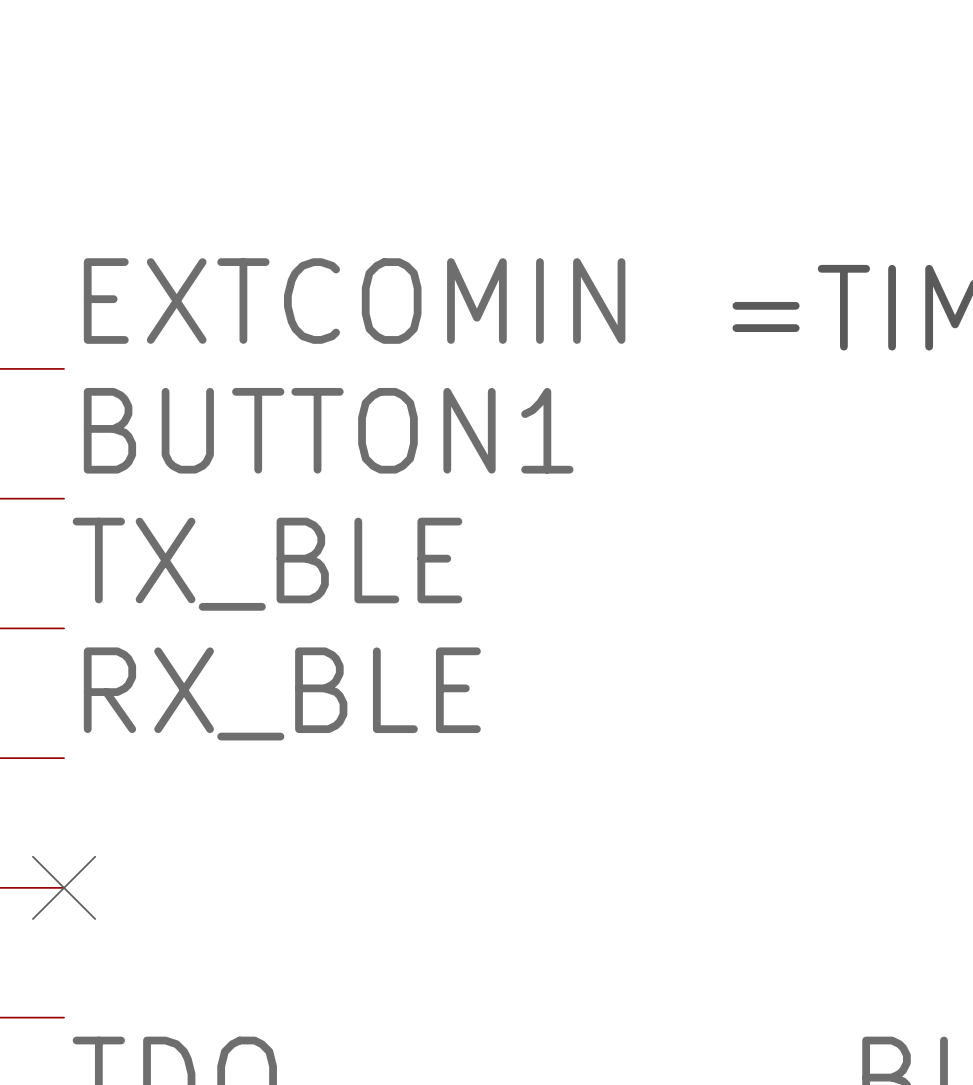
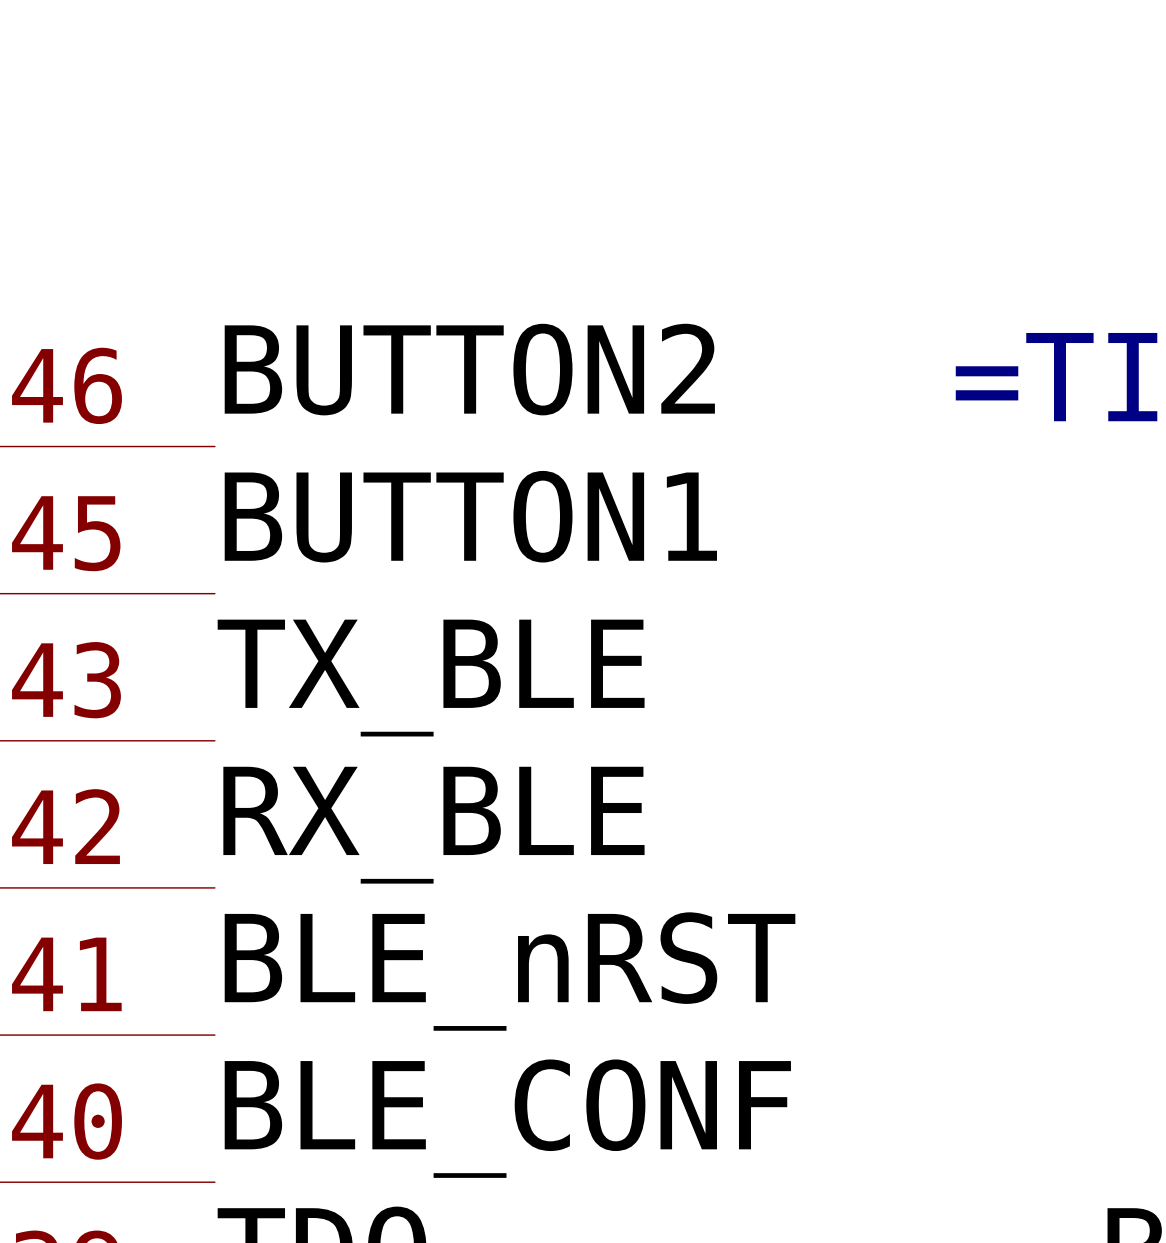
label: EXTCOMIN (354, 301) -> BUTTON2 (469, 369)
label: none -> BLE_nRST (510, 971)
no-connect mark: (64, 887) -> none
label: none -> BLE_CONF (507, 1118)

